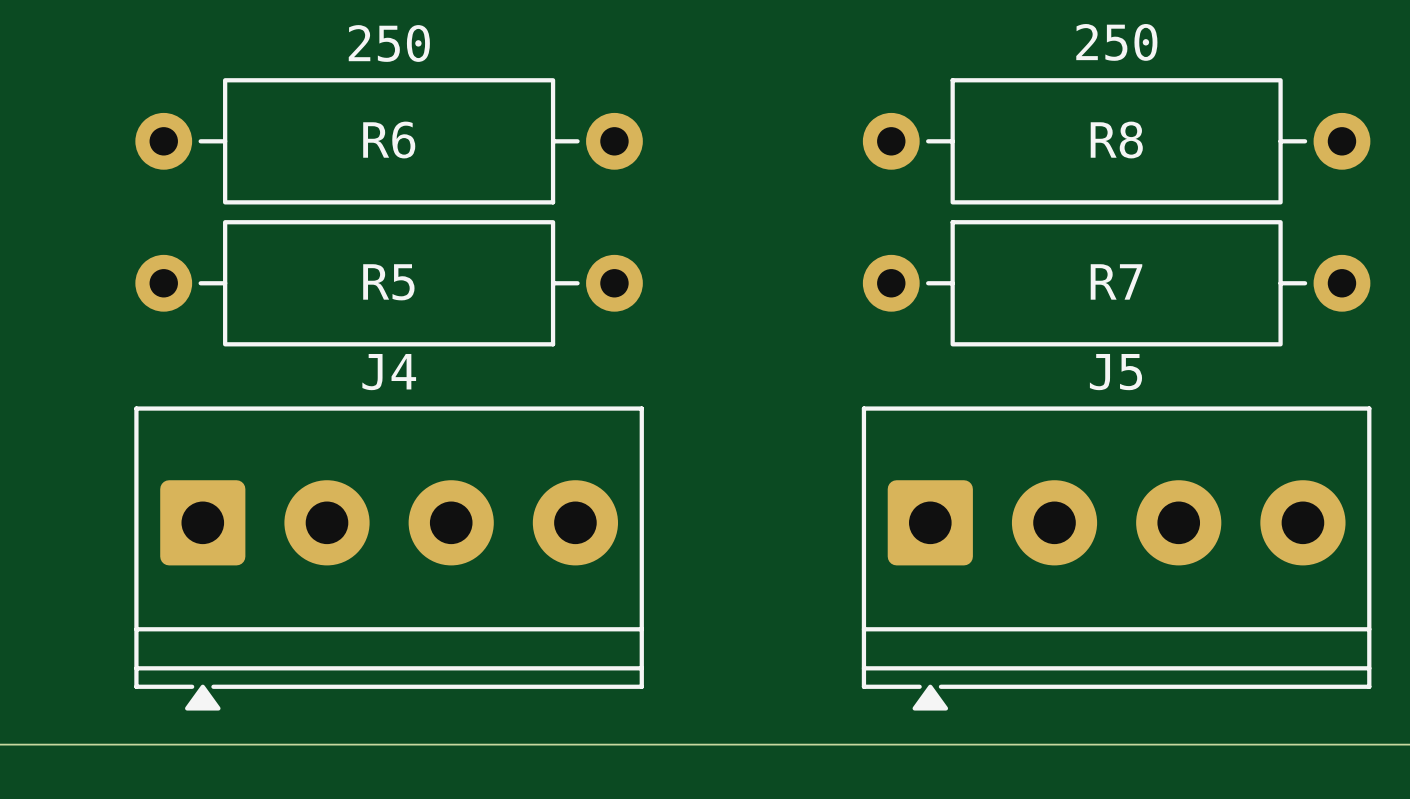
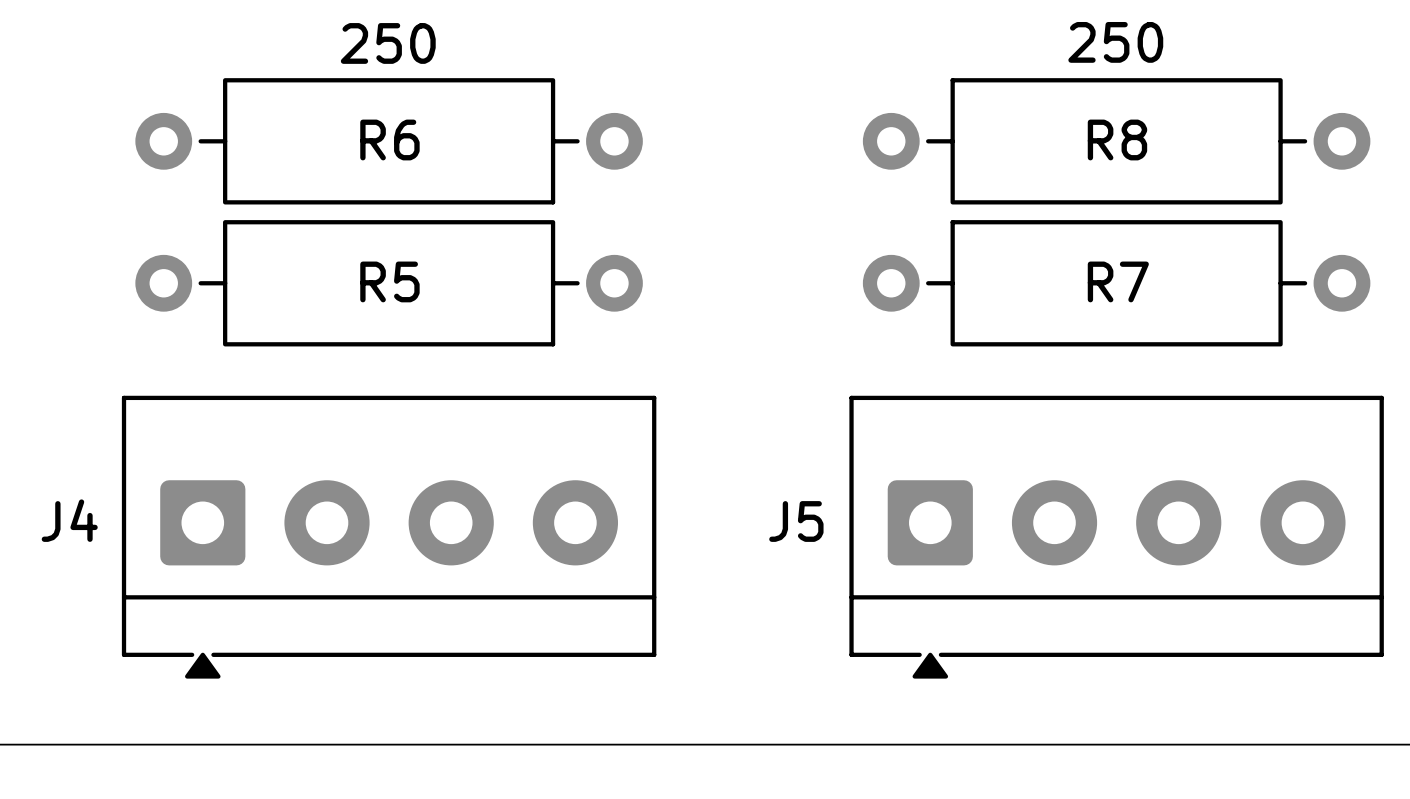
J4 name position: J4 (389, 372) -> J4 (69, 520)
J5 name position: J5 (1115, 372) -> J5 (796, 521)
J4 footprint: [134, 406, 644, 711] -> [121, 395, 657, 679]
J5 footprint: [861, 406, 1372, 711] -> [849, 395, 1384, 679]

